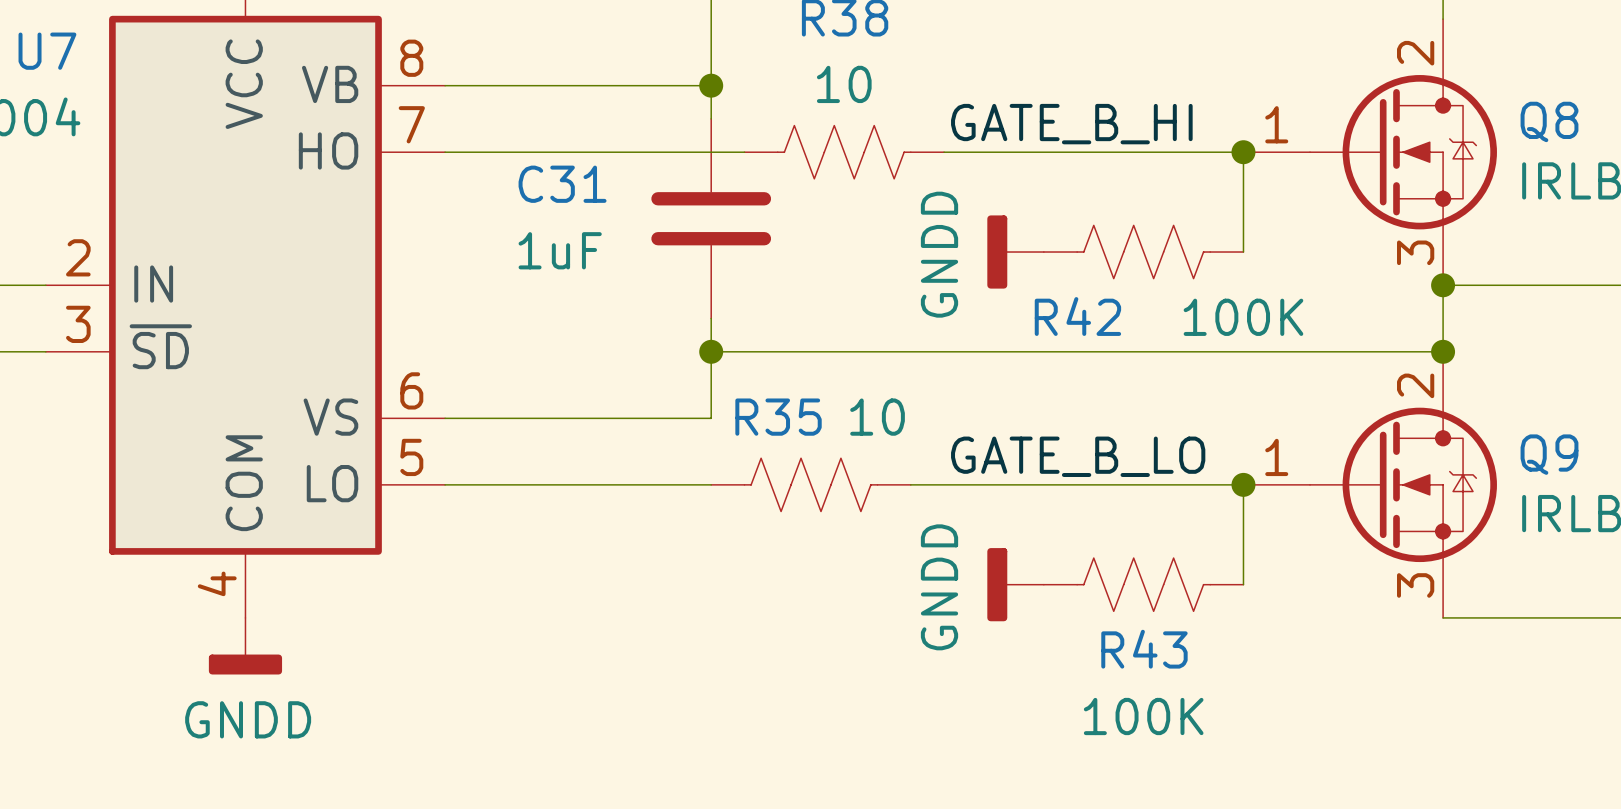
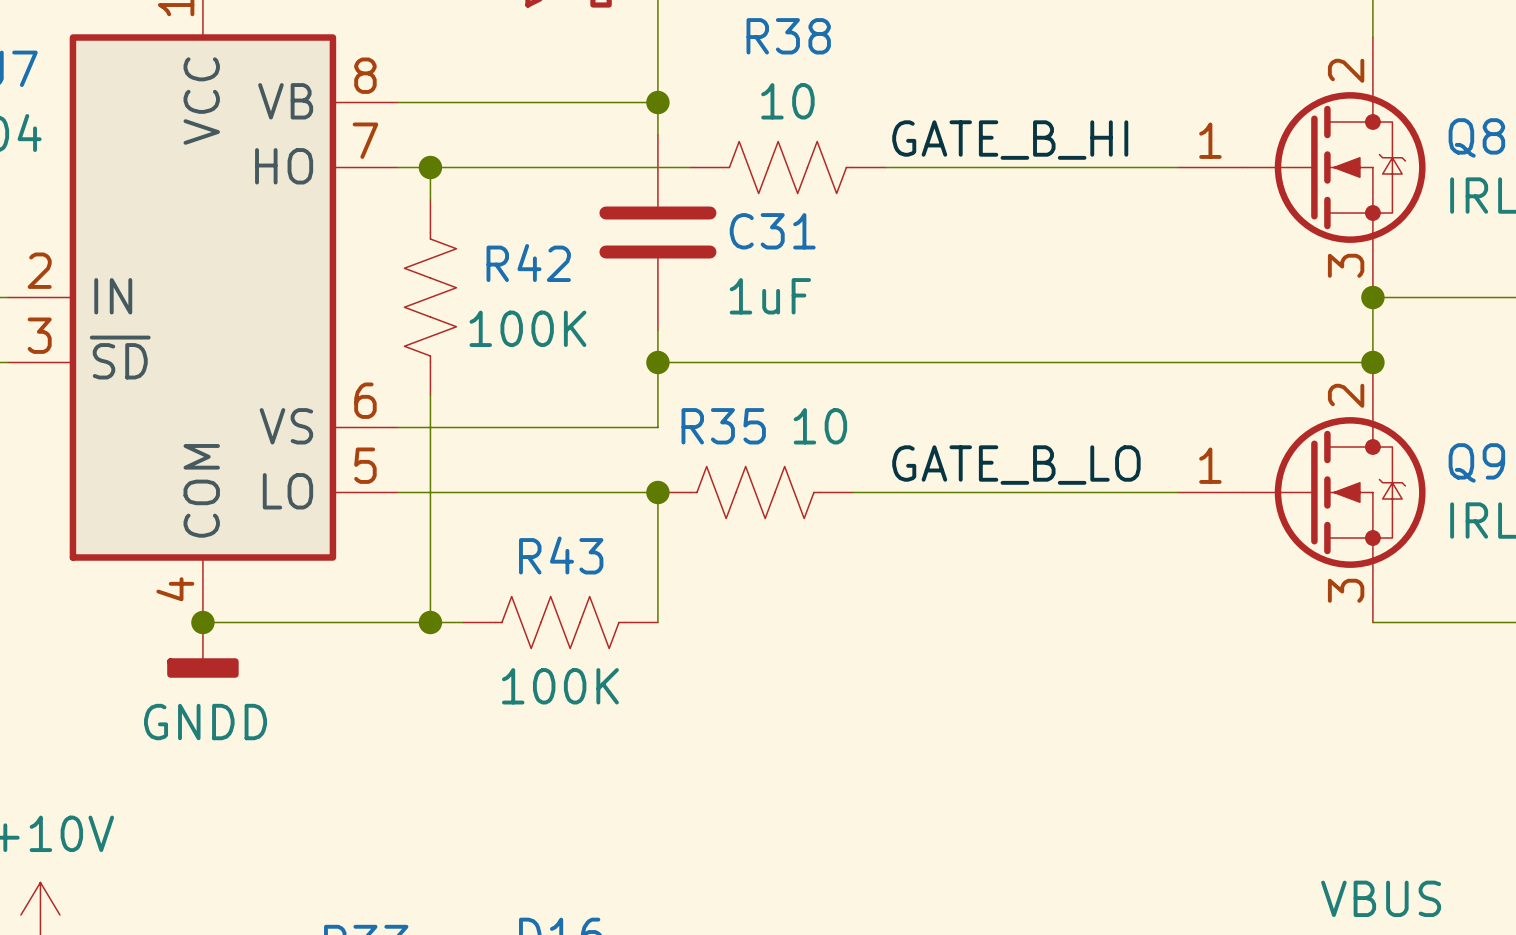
wire: none -> (430, 167) (430, 200)
junction: none -> (430, 167)
wire: (1243, 152) (1243, 252) -> none
junction: (1243, 152) -> none
C31 name position: C31 (562, 184) -> C31 (772, 231)
C31 value position: 1uF (560, 250) -> 1uF (770, 296)
power symbol: GNDD (1015, 252) -> none
R42 rotation: 0° (1143, 252) -> 90° clockwise (430, 297)
R42 position: (1143, 252) -> (430, 297)
R42 name position: R42 (1077, 316) -> R42 (528, 263)
wire: none -> (430, 395) (430, 622)
wire: none -> (657, 492) (657, 622)
junction: none -> (657, 492)
wire: (1243, 484) (1243, 584) -> none
junction: (1243, 484) -> none
power symbol: GNDD (1015, 584) -> none
R43 position: (1143, 584) -> (560, 622)
wire: none -> (202, 622) (462, 622)
junction: none -> (202, 622)
junction: none -> (430, 622)
R43 name position: R43 (1144, 649) -> R43 (561, 555)
R43 value position: 100K (1143, 716) -> 100K (560, 686)

